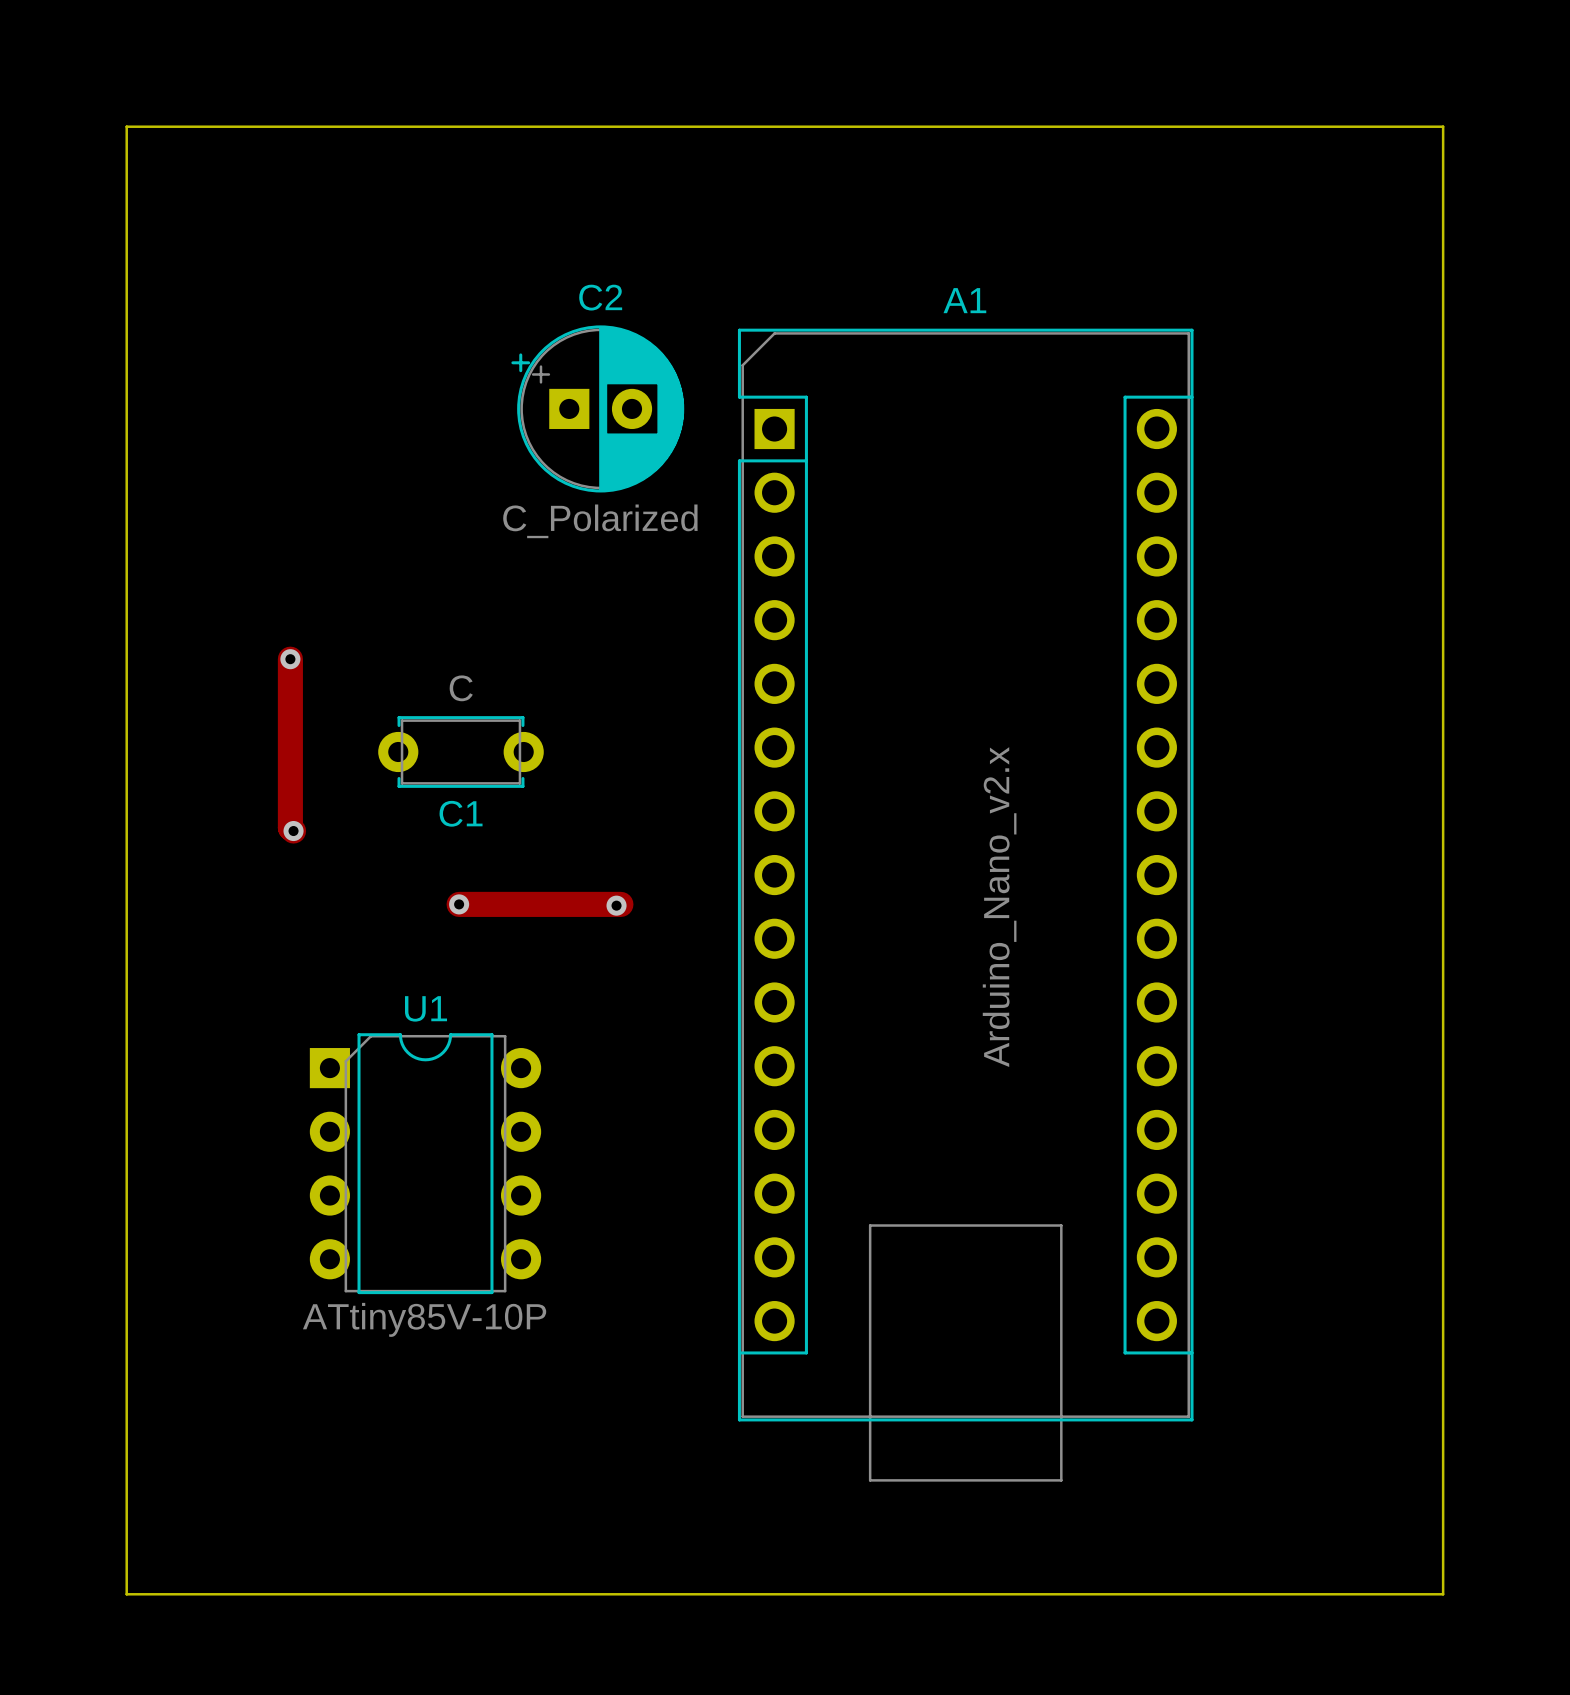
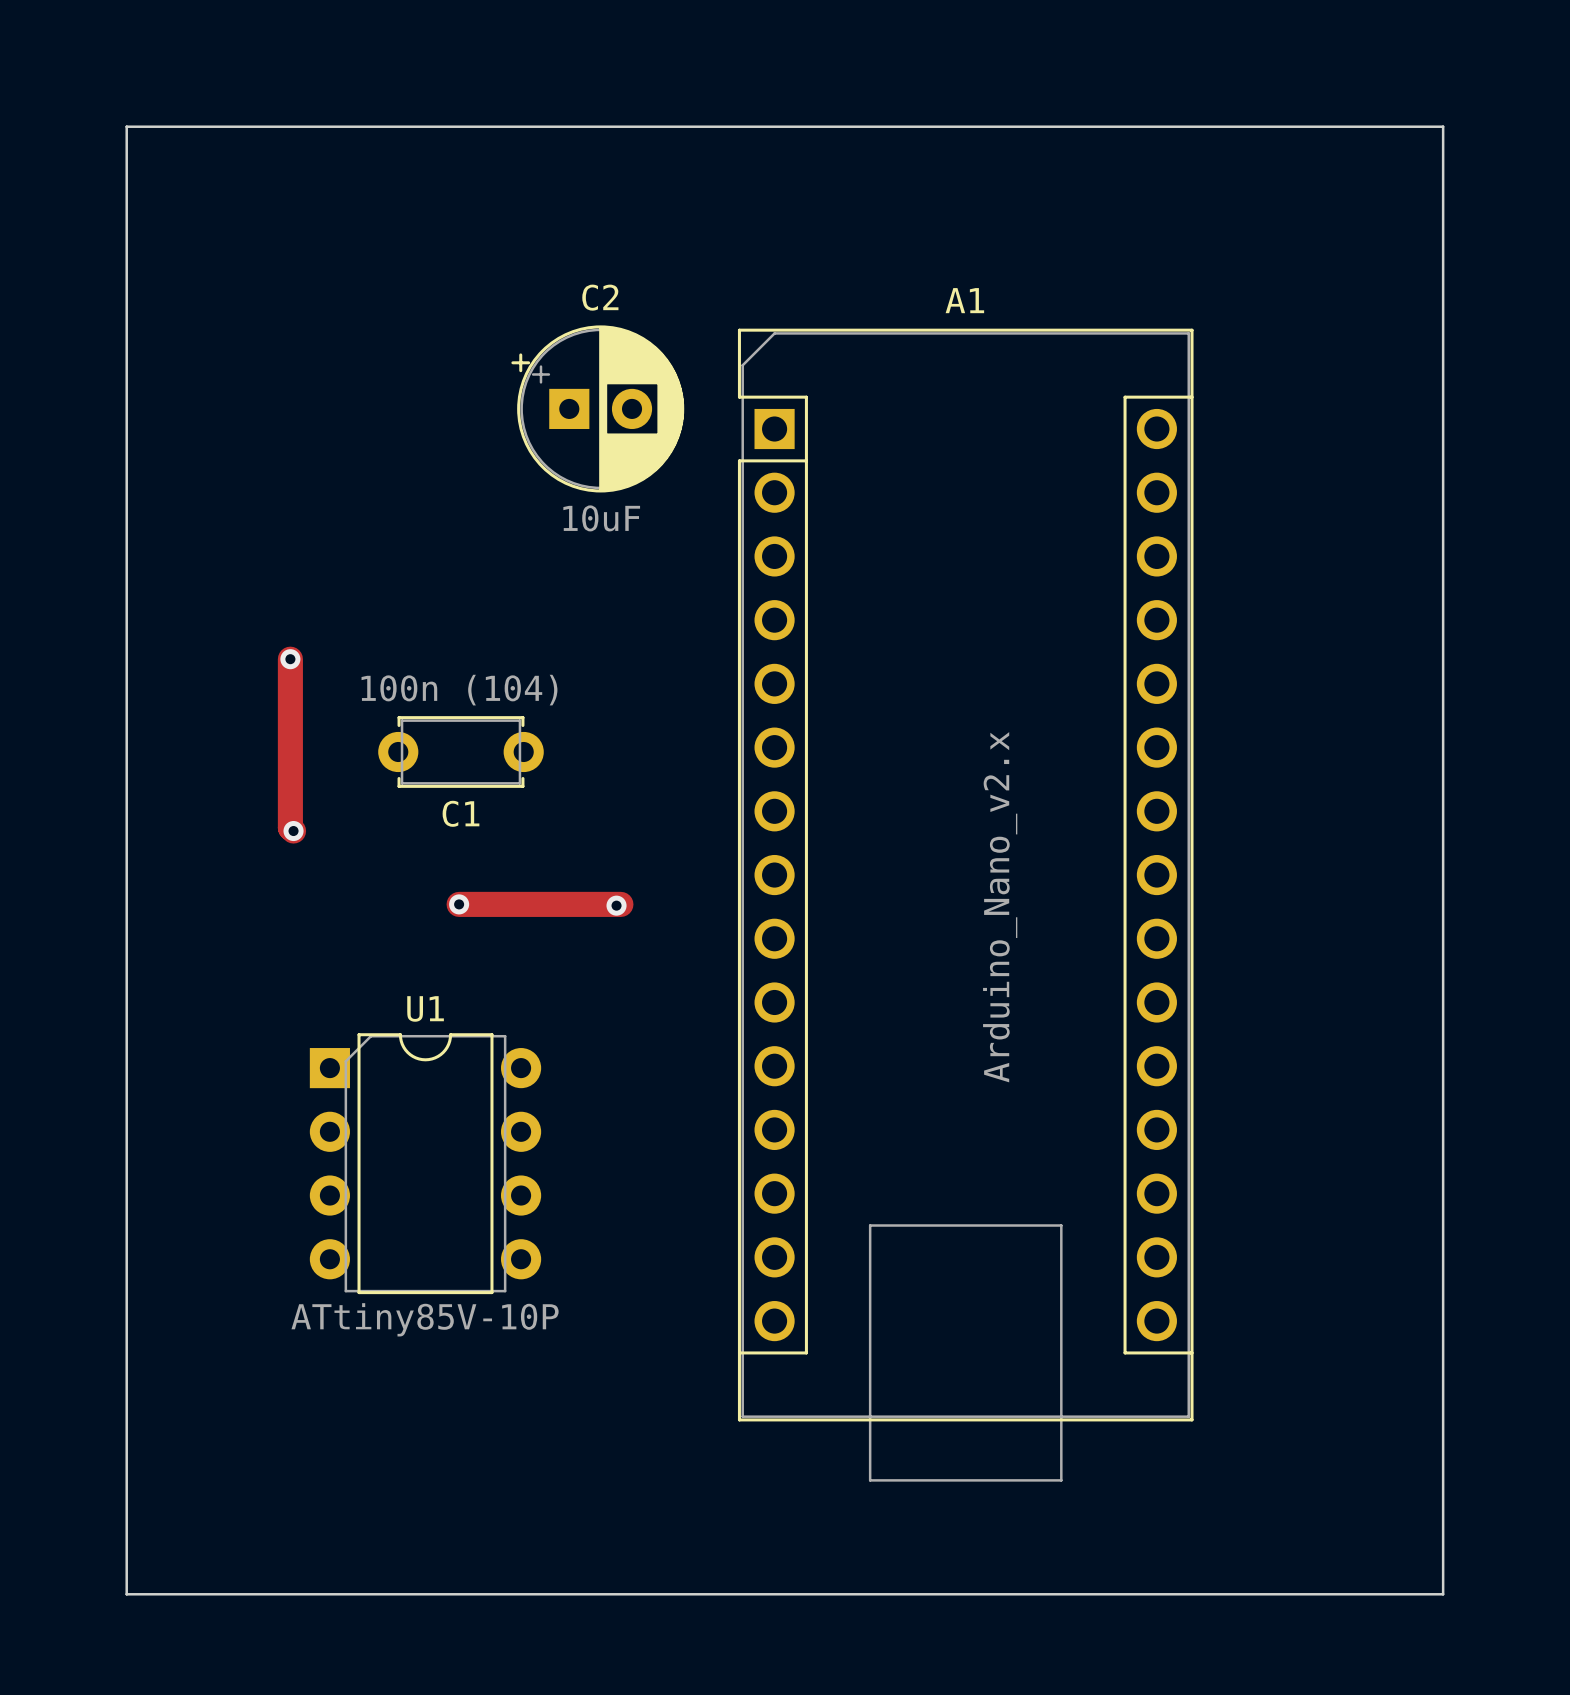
C2 value: C_Polarized (600, 521) -> 10uF (601, 518)
C1 value: C (461, 688) -> 100n (104) (459, 690)

